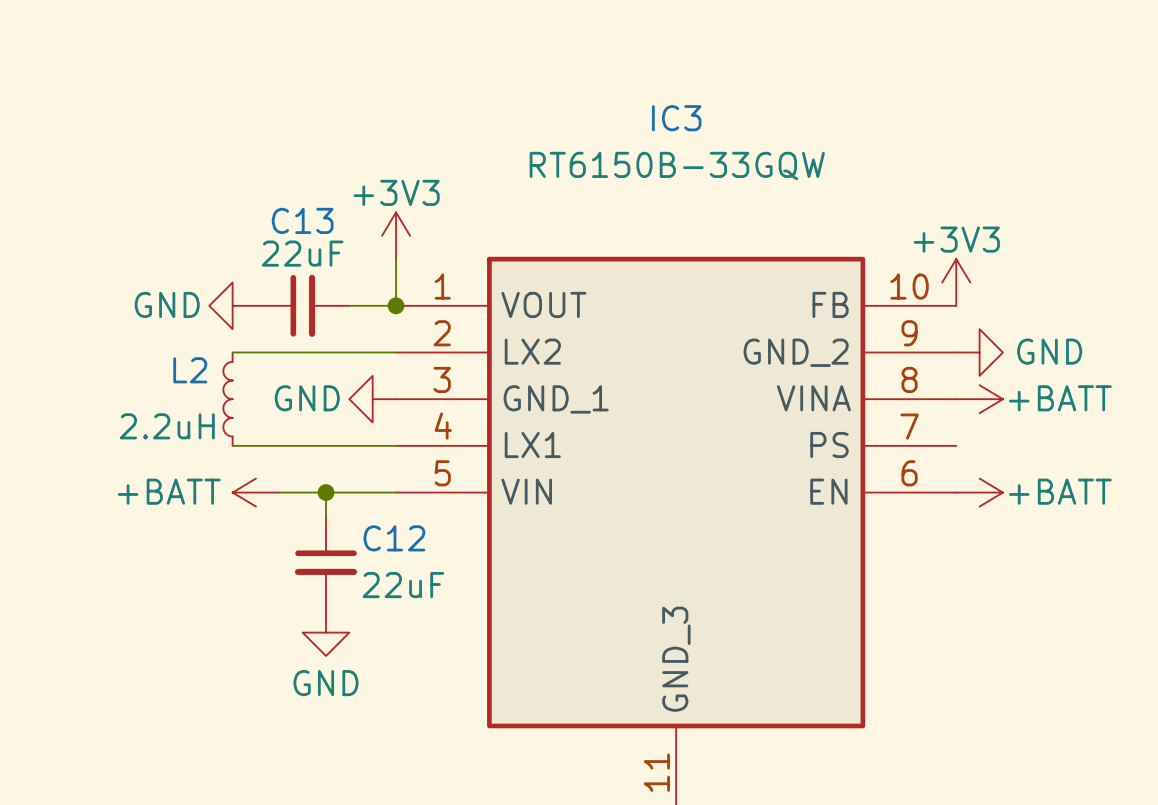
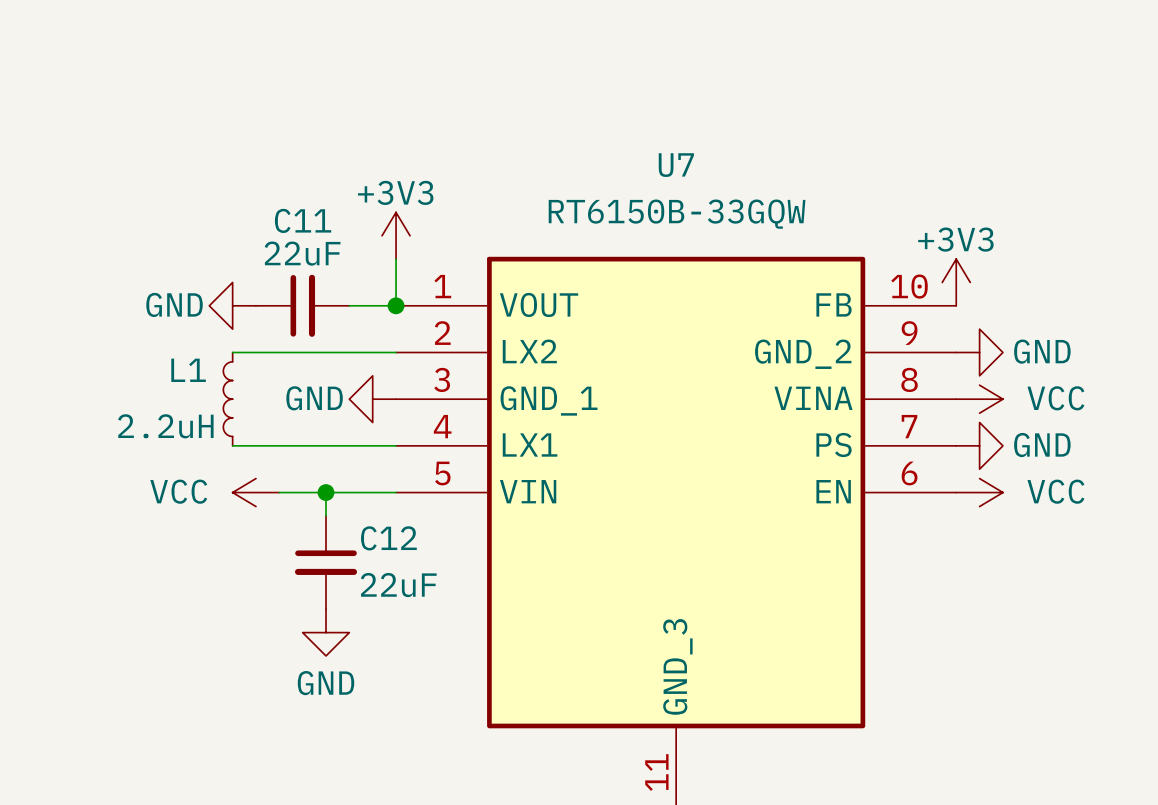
IC3 name: IC3 (676, 118) -> U7 (676, 165)
IC3 value position: RT6150B-33GQW (677, 166) -> RT6150B-33GQW (677, 214)
C13 name: C13 (302, 220) -> C11 (303, 220)
L2 name: L2 (190, 370) -> L1 (188, 370)
power symbol: +BATT (979, 399) -> VCC (979, 399)
power symbol: none -> GND (979, 445)
power symbol: +BATT (255, 492) -> VCC (255, 492)
power symbol: +BATT (979, 492) -> VCC (979, 492)

